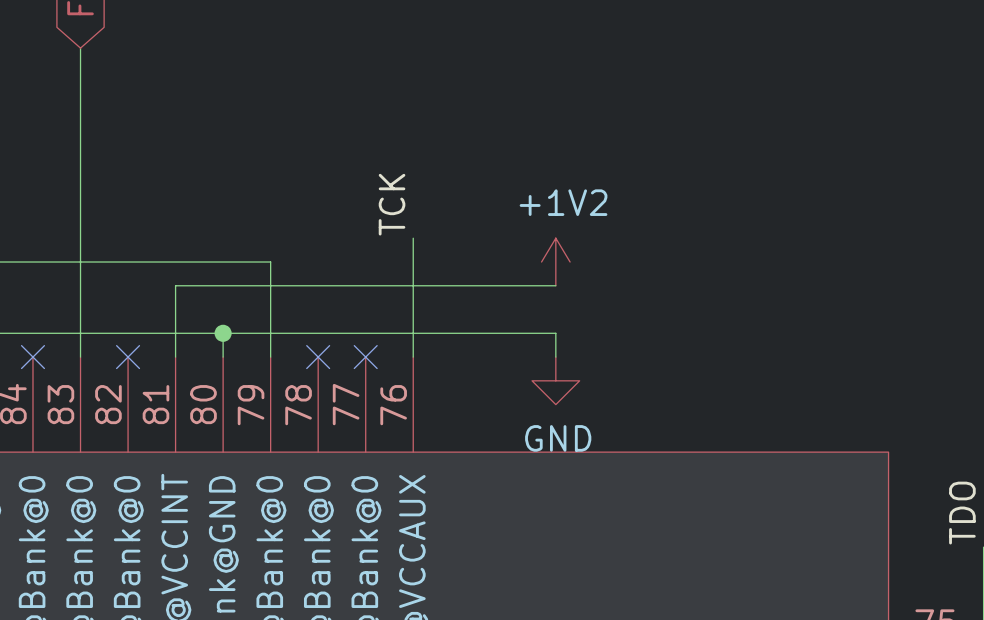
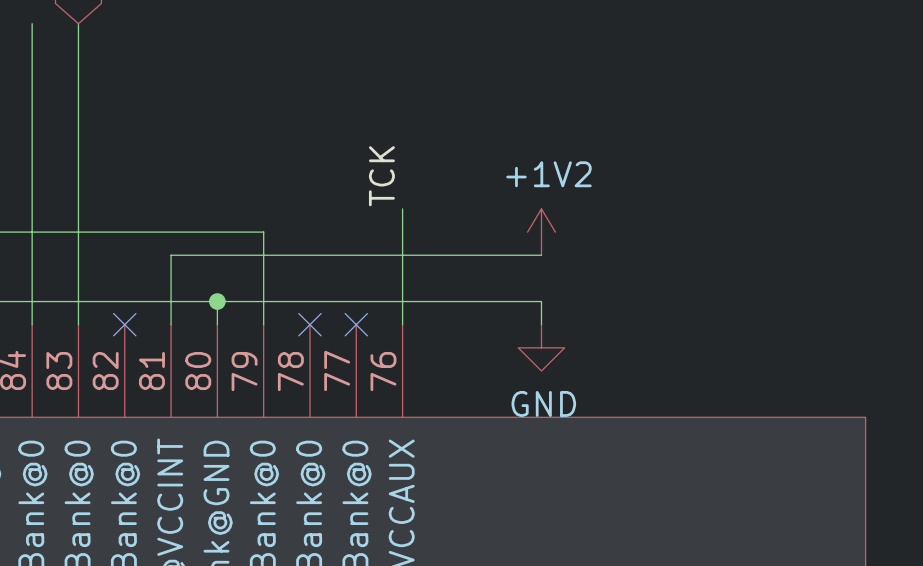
wire: none -> (32, 23) (32, 324)
no-connect mark: (32, 357) -> none

